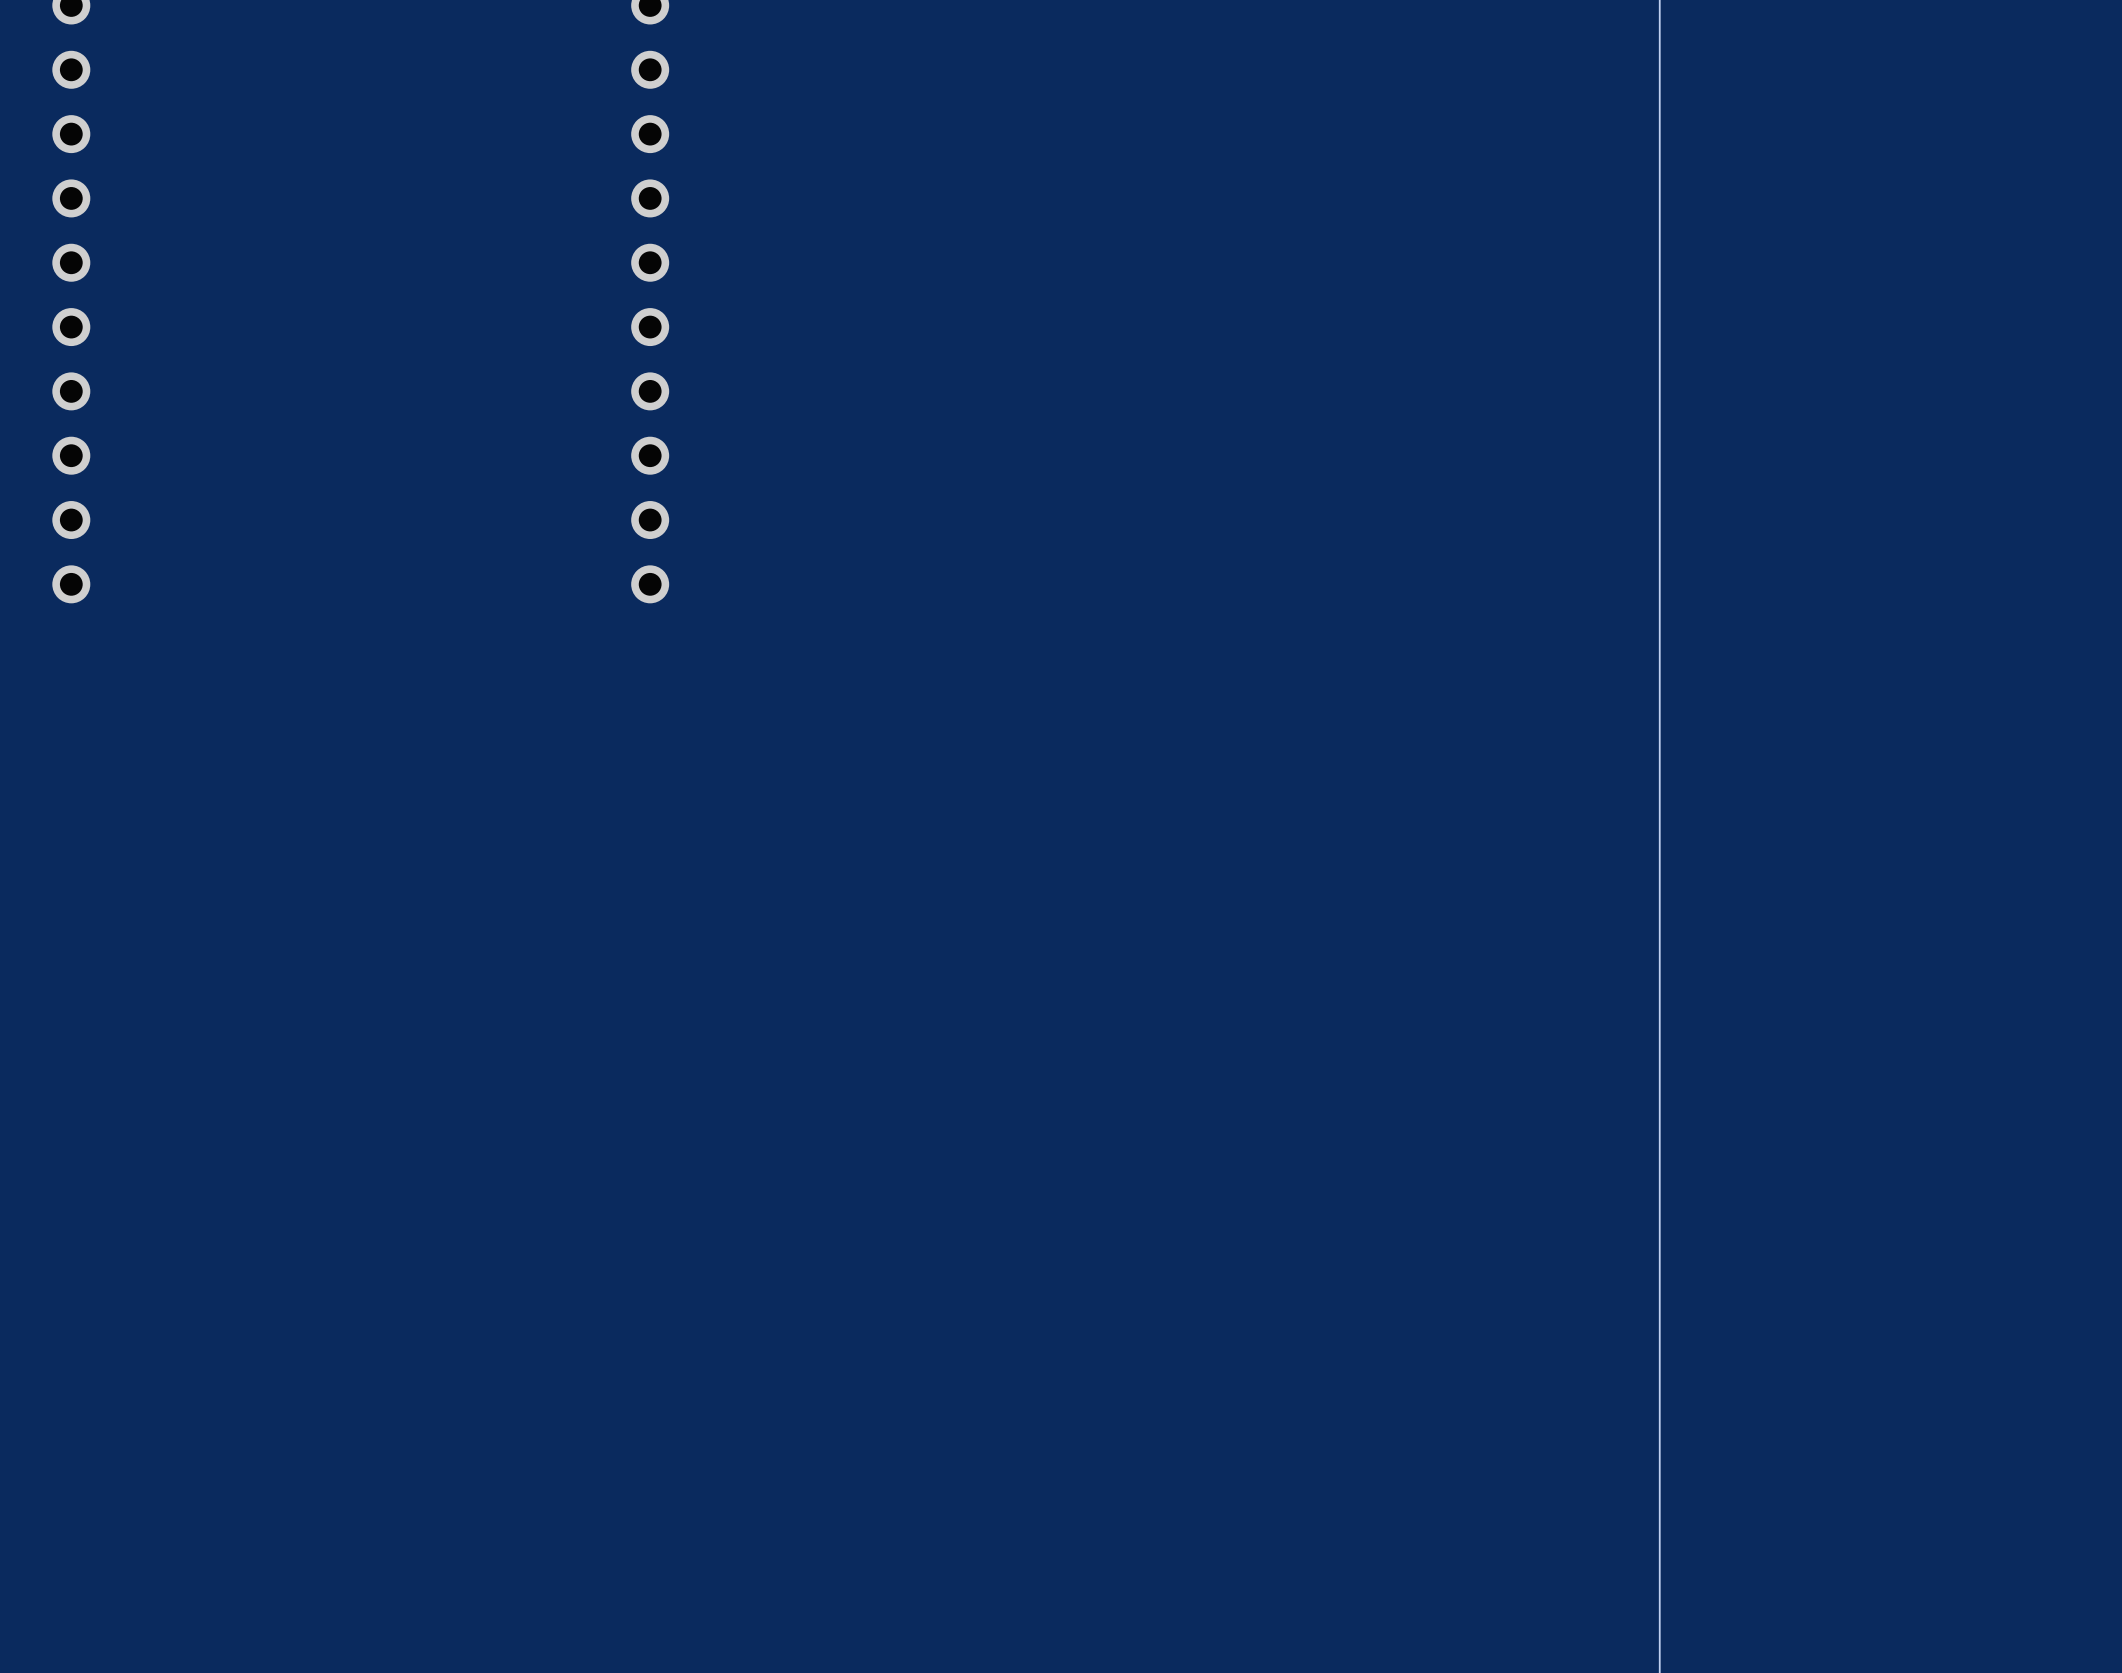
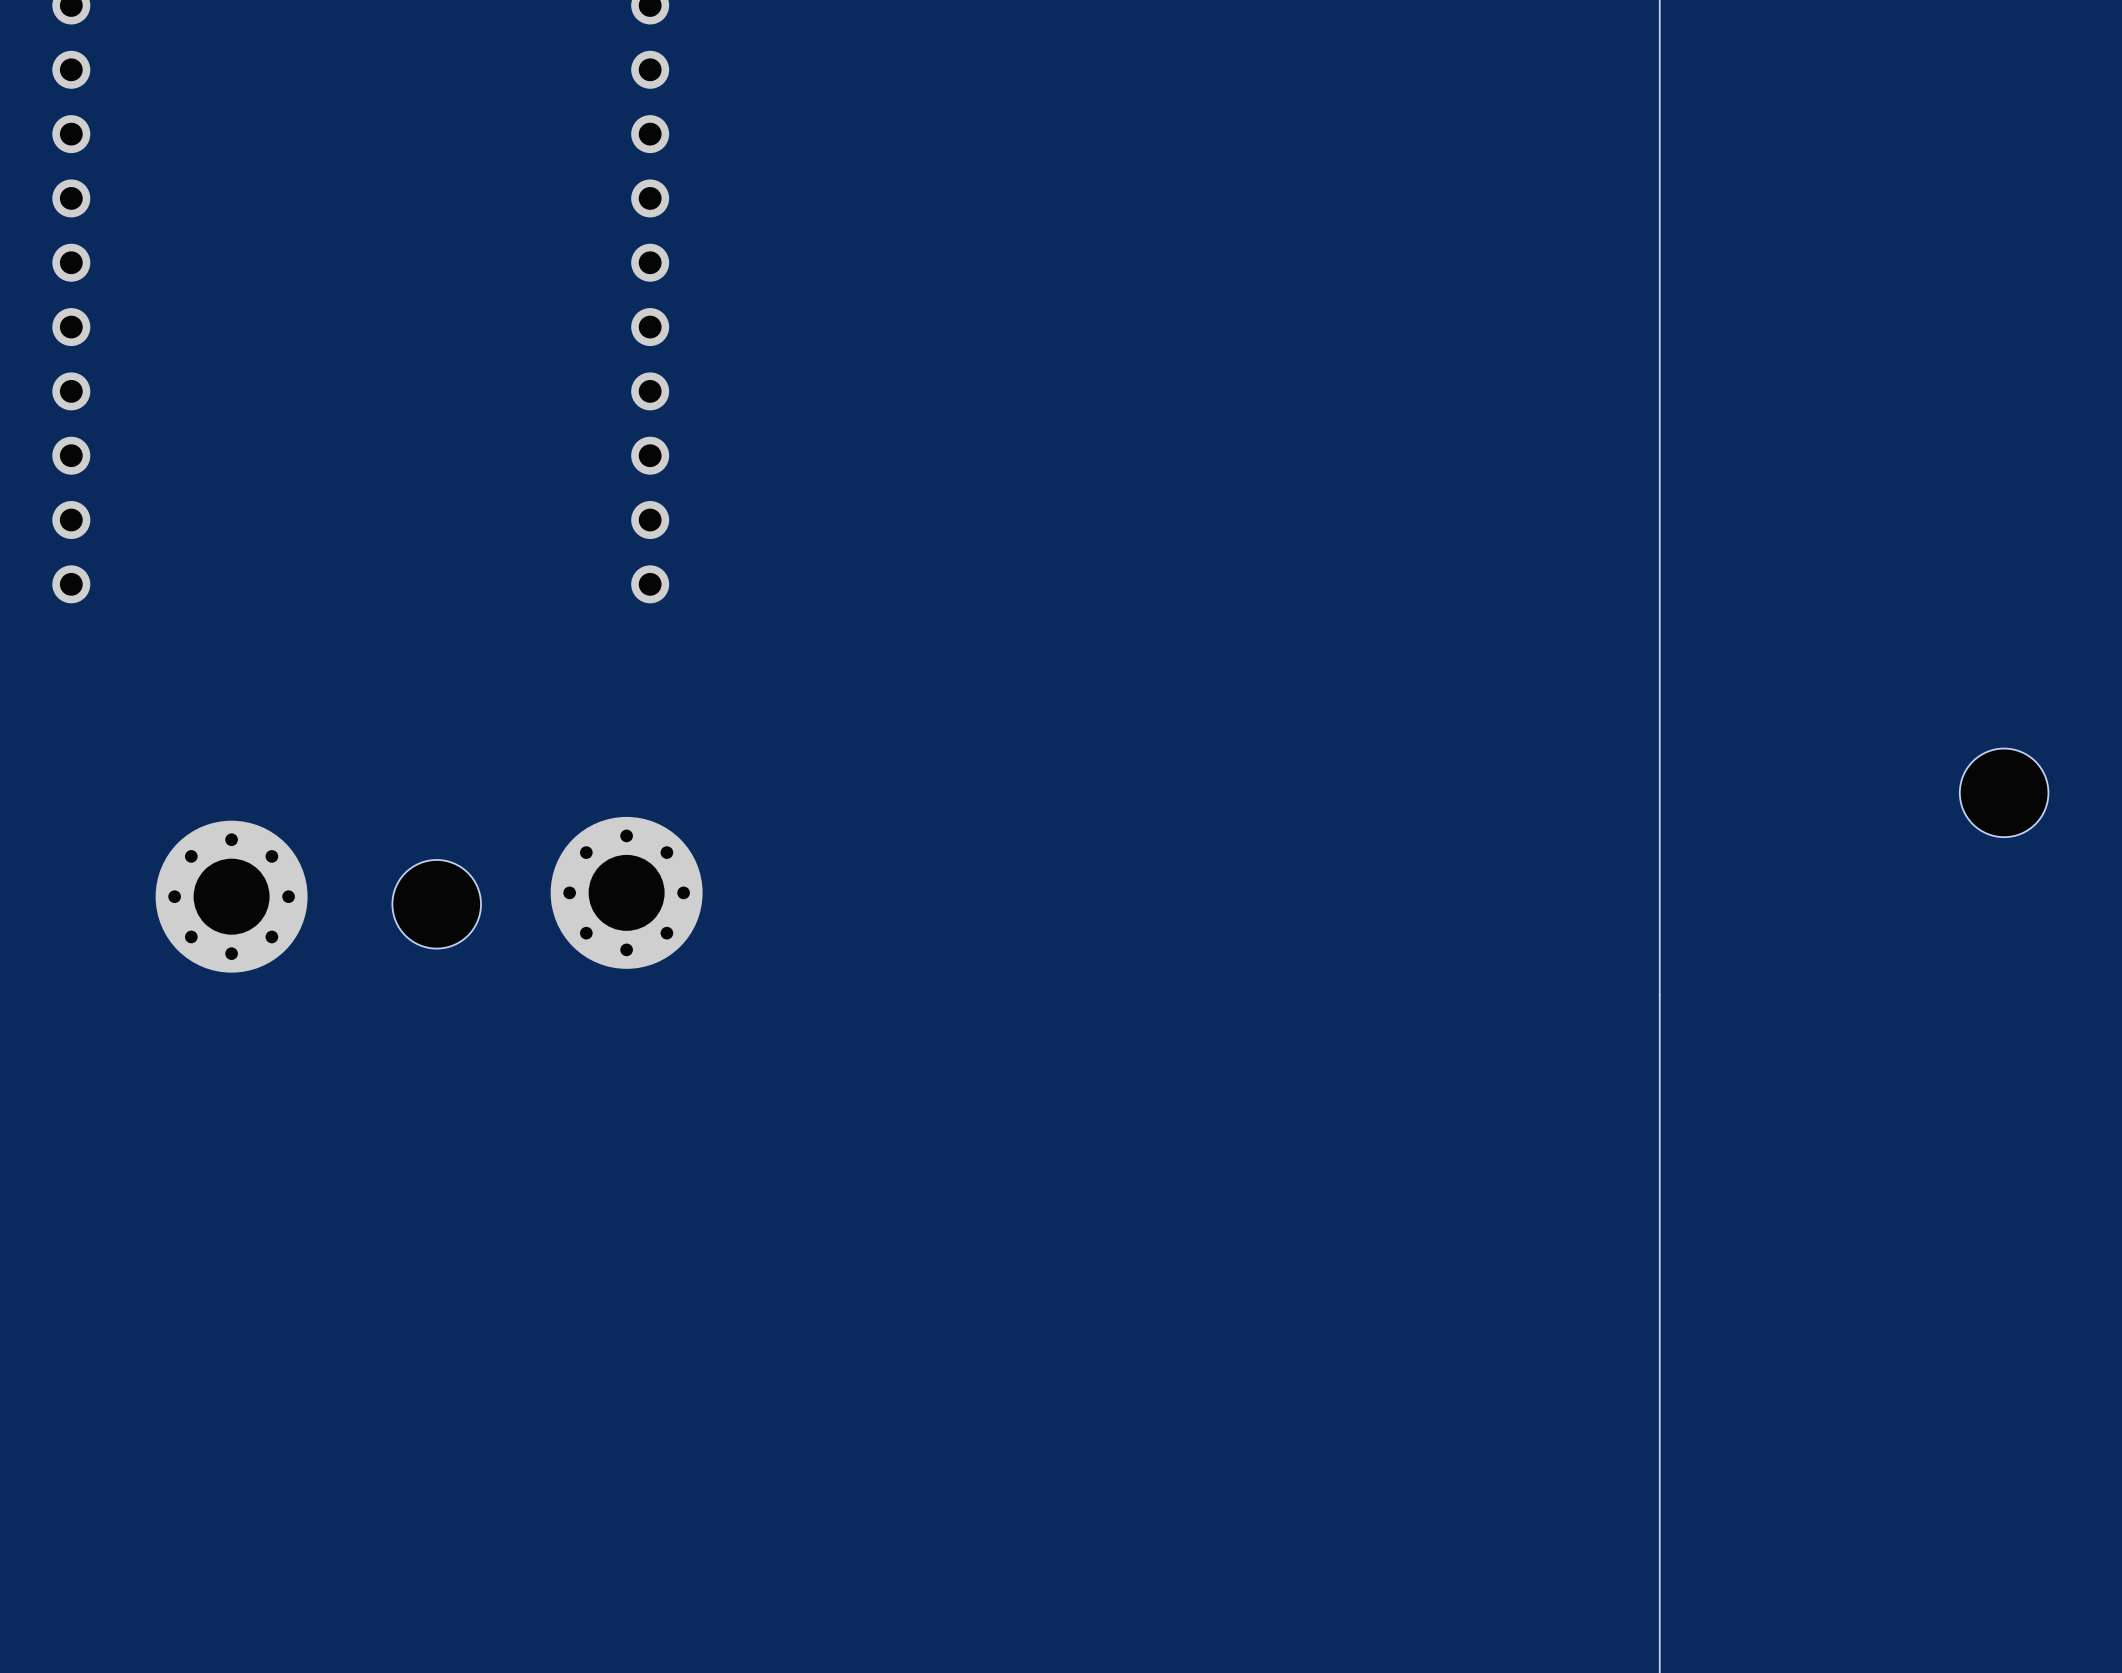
part: none -> (2004, 792)
part: none -> (626, 892)
part: none -> (231, 896)
part: none -> (436, 904)

